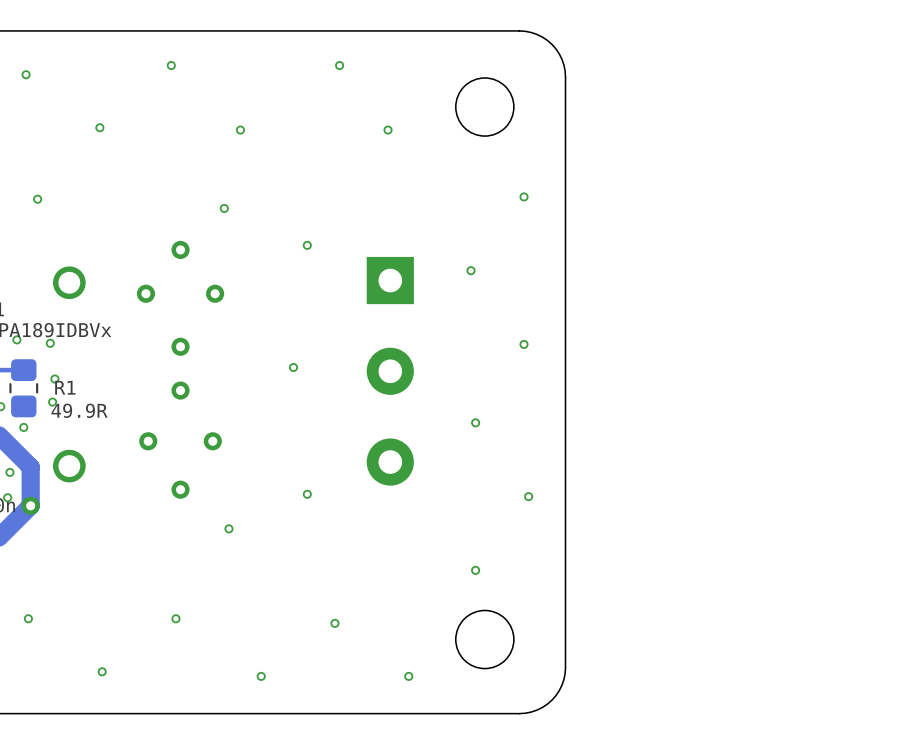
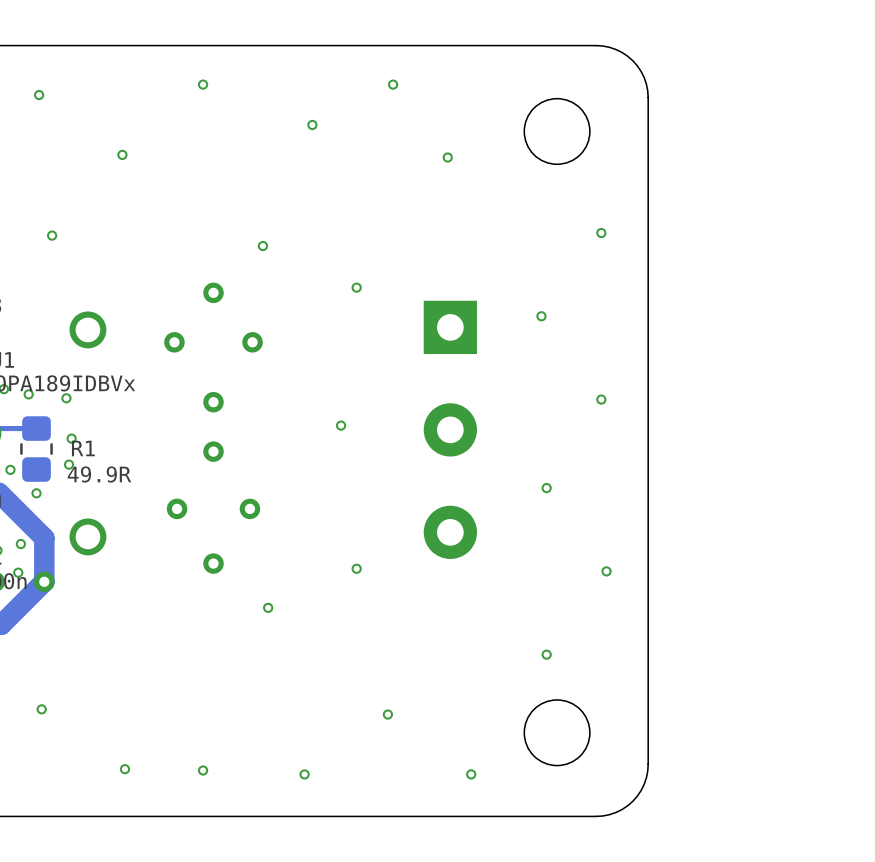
via position: (240, 130) -> (312, 124)
via position: (175, 618) -> (203, 770)

